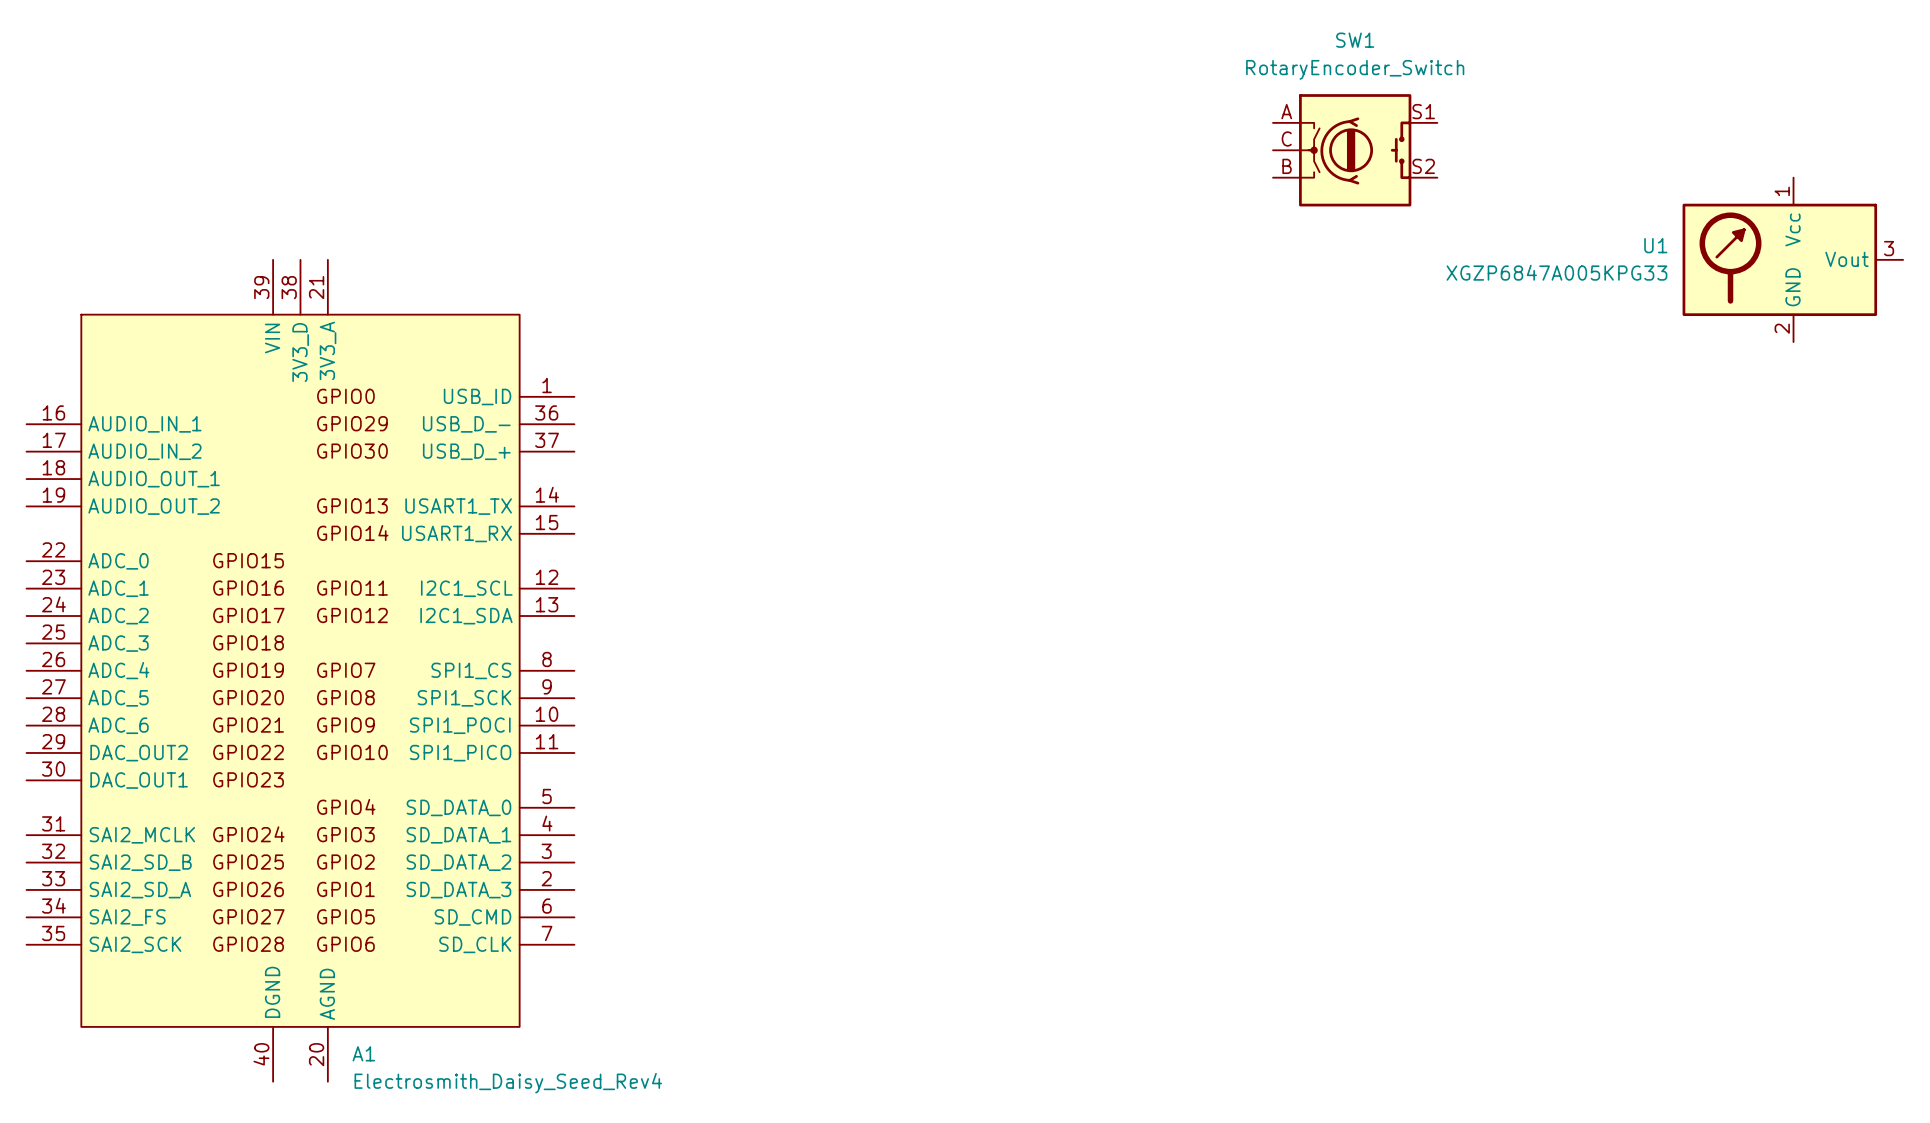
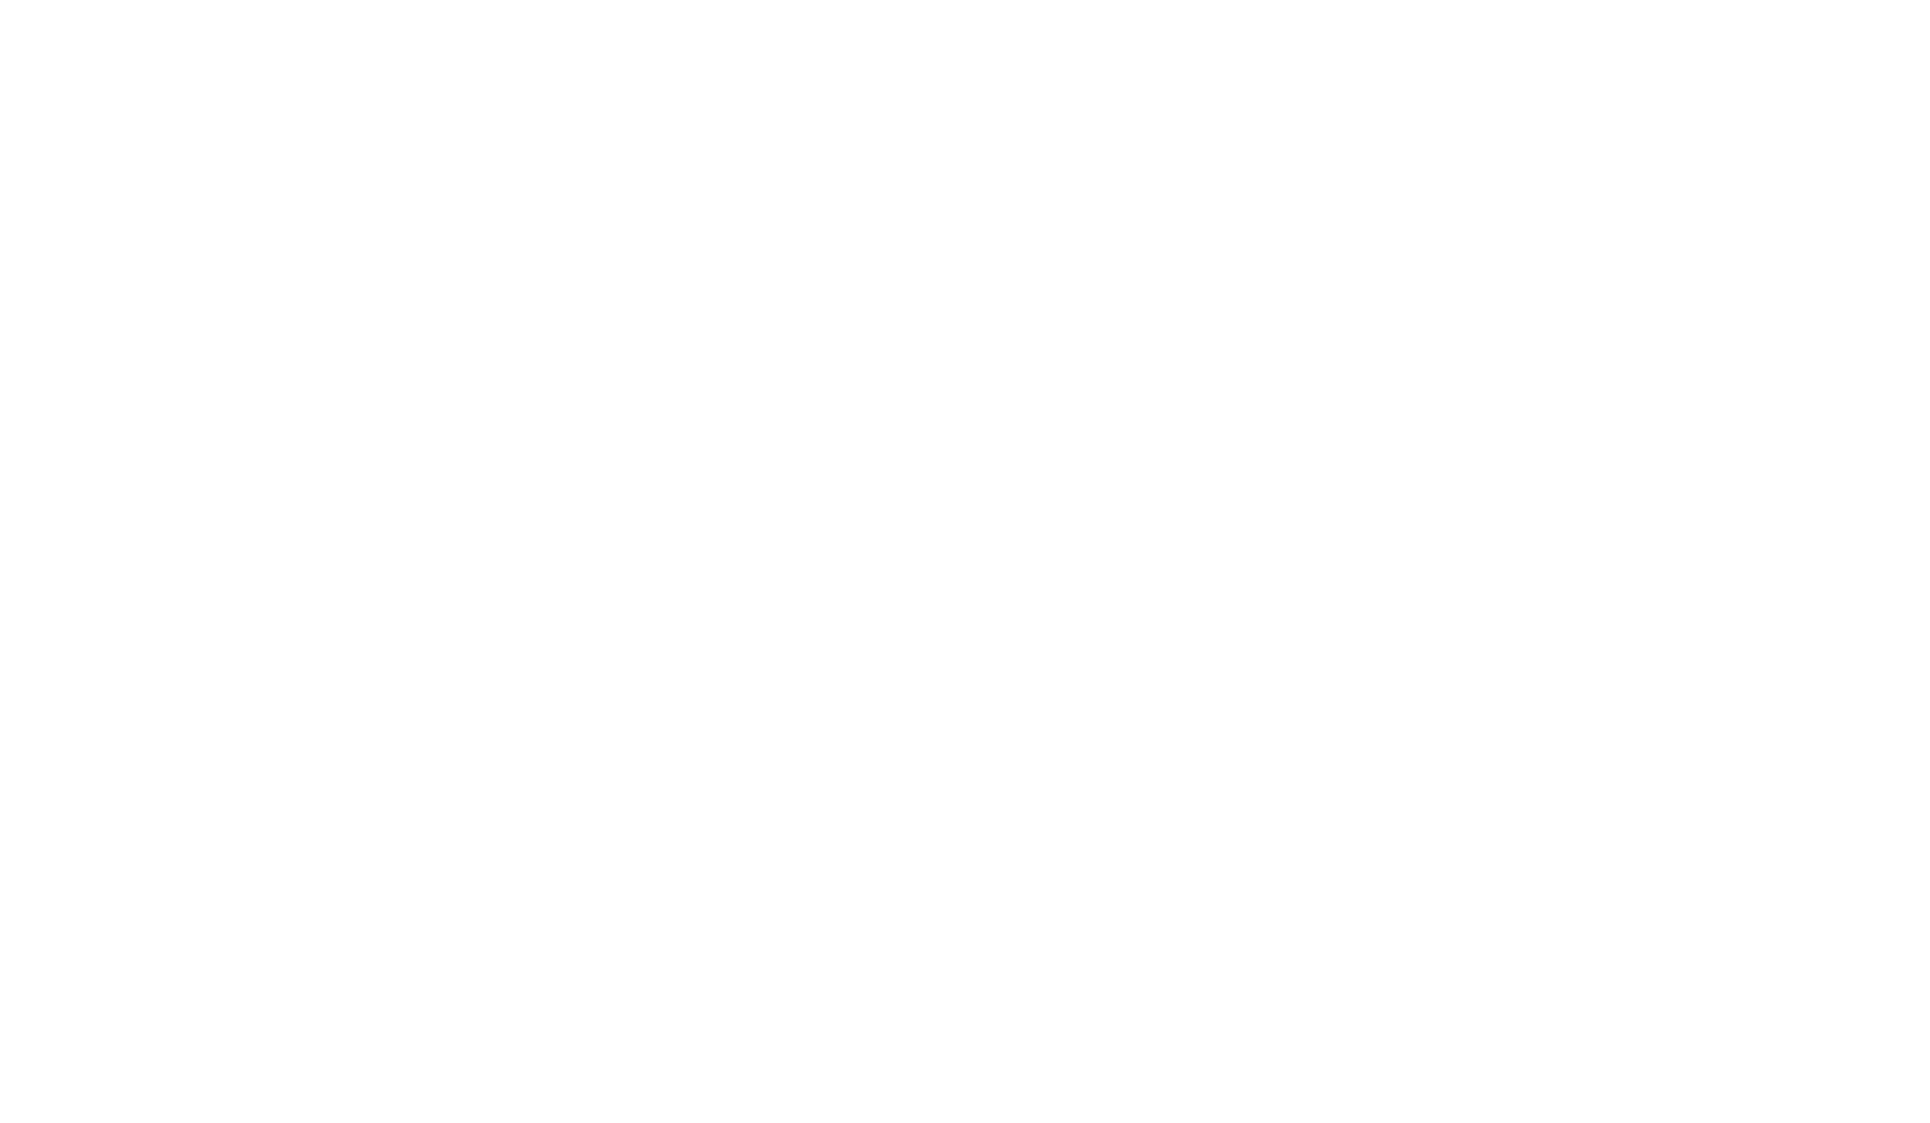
SW1: RotaryEncoder_Switch (1355, 150) -> none
U1: XGZP6847A005KPG33 (1792, 259) -> none
A1: Electrosmith_Daisy_Seed_Rev4 (300, 670) -> none

